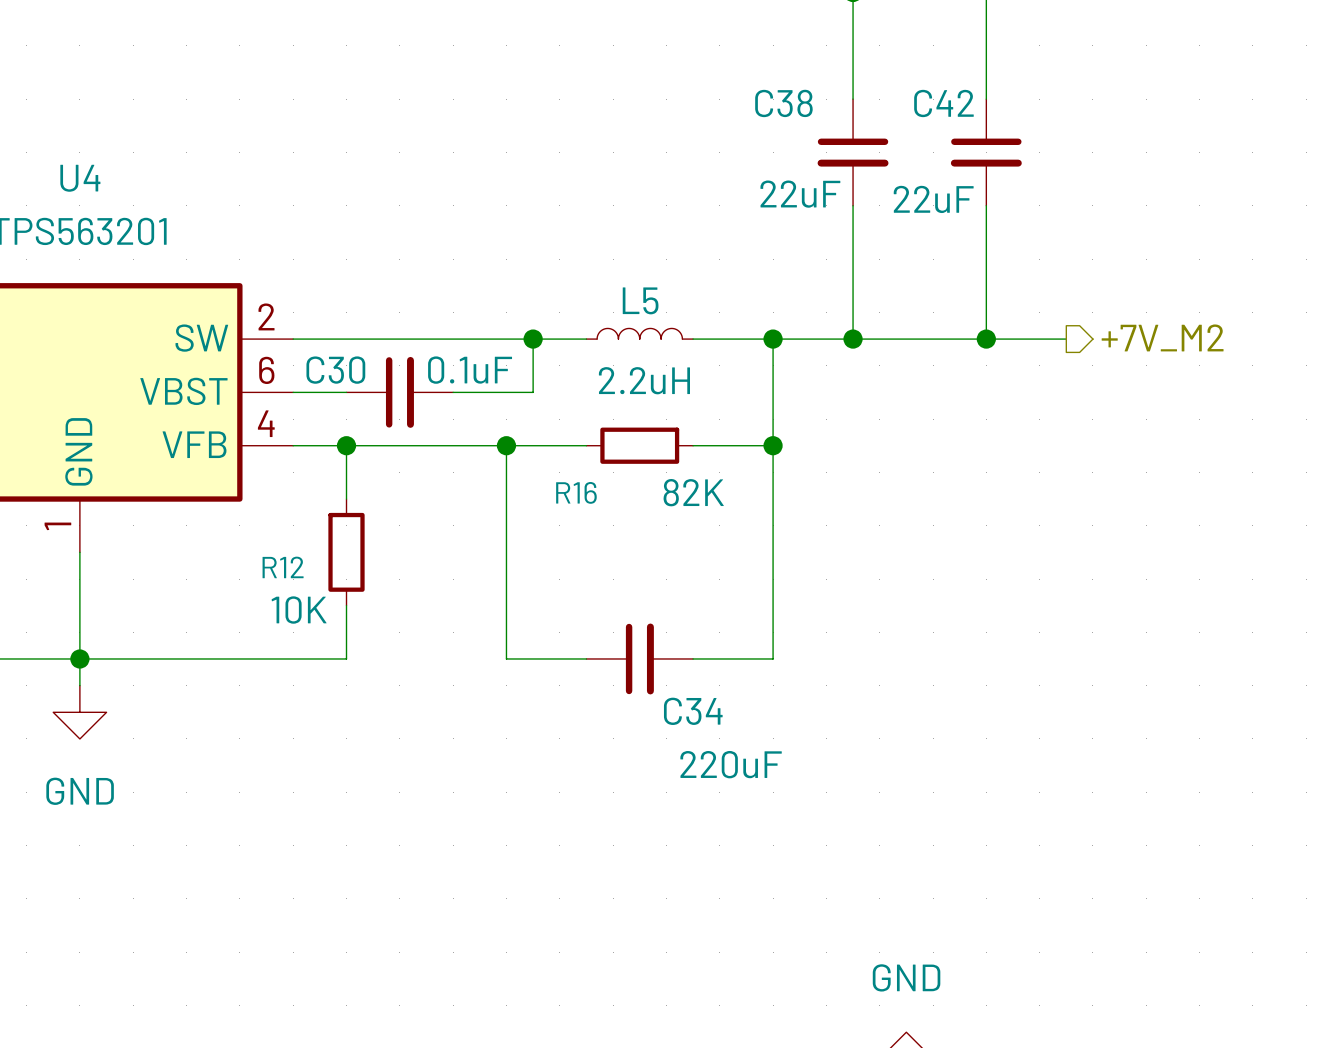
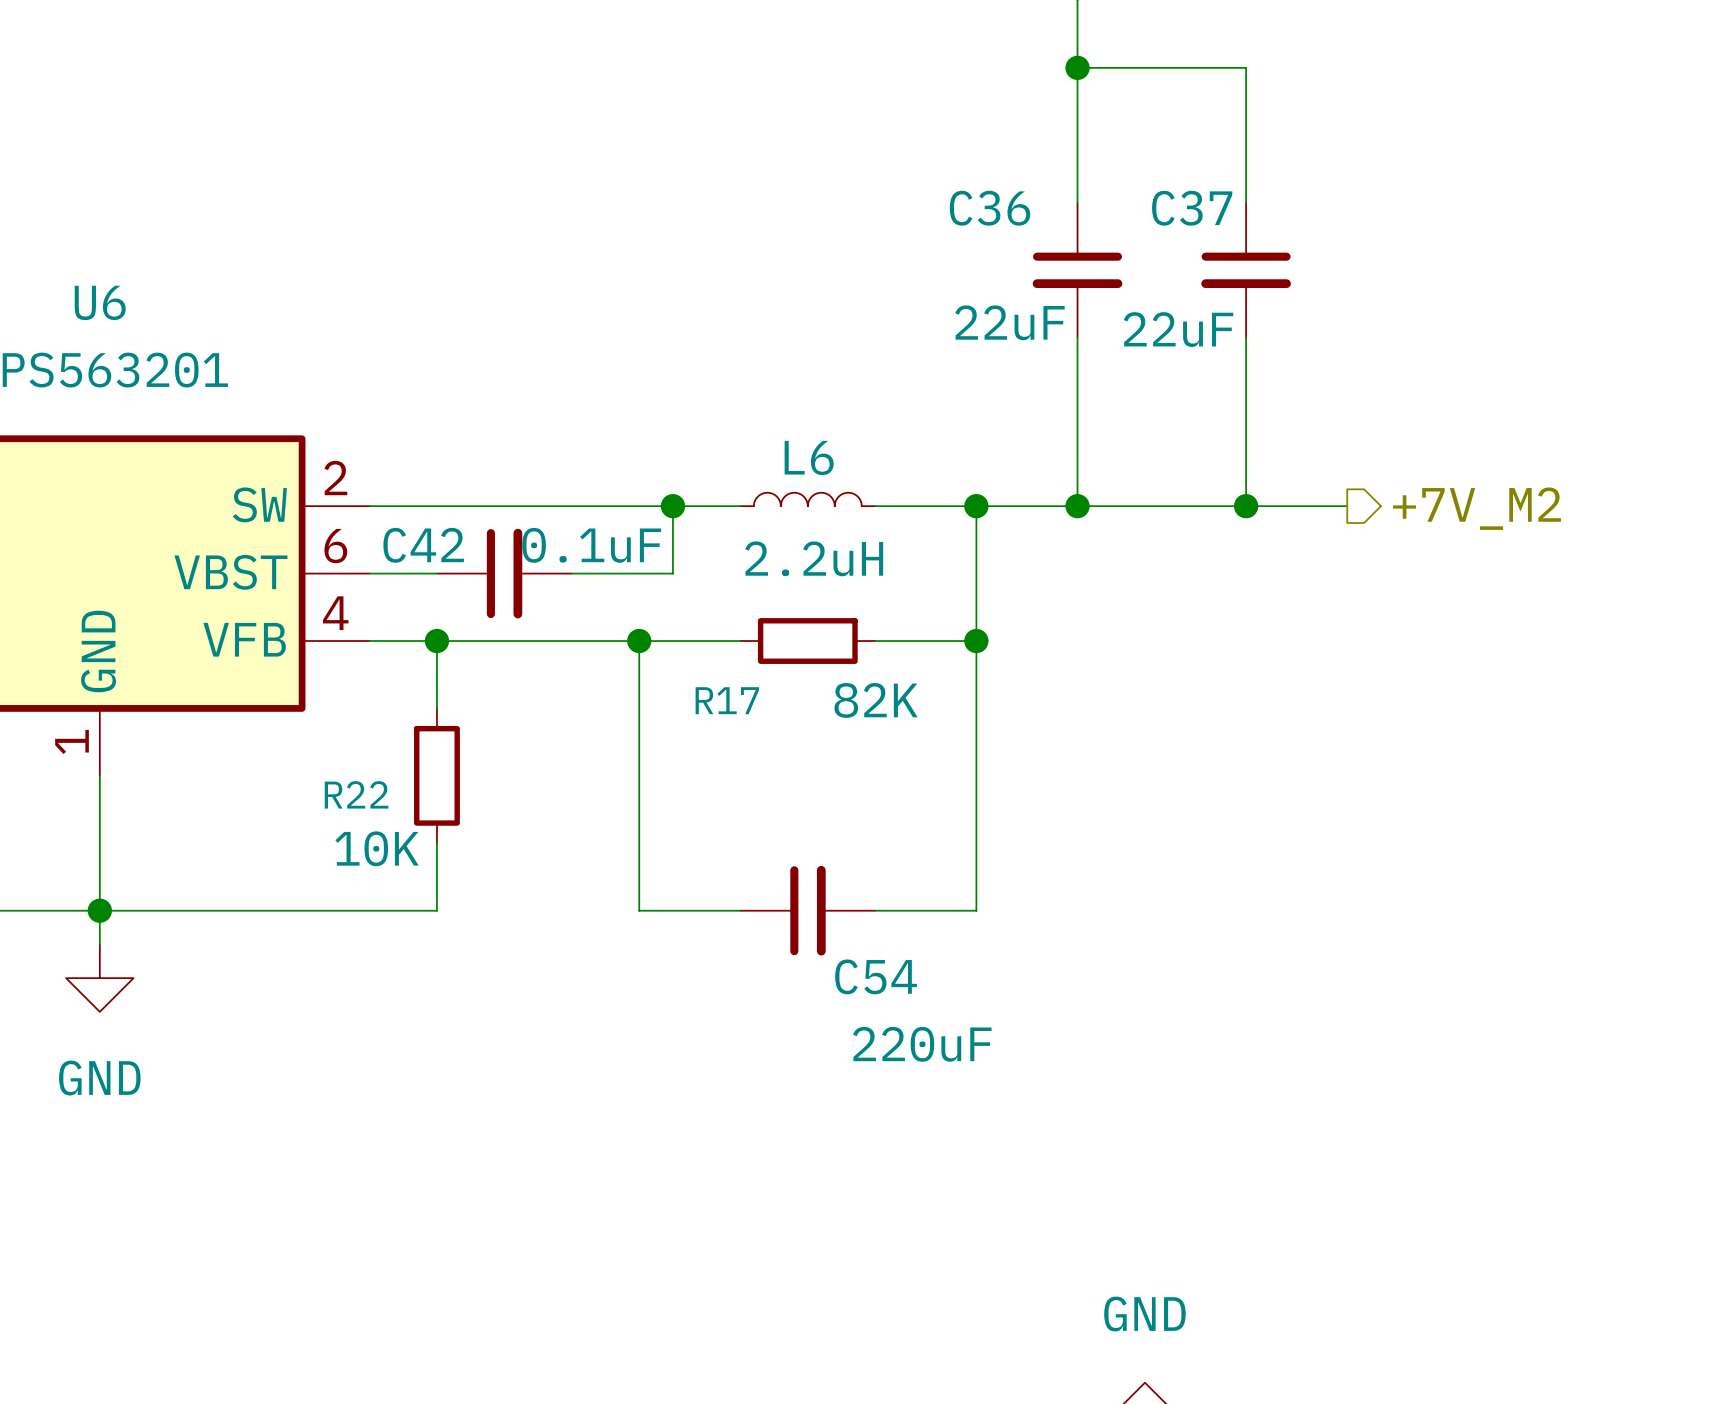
C38 name: C38 (783, 103) -> C36 (990, 208)
C42 name: C42 (943, 103) -> C37 (1192, 208)
U4 name: U4 (80, 178) -> U6 (100, 302)
L5 name: L5 (640, 300) -> L6 (809, 457)
C30 name: C30 (335, 370) -> C42 (423, 545)
R16 name: R16 (576, 492) -> R17 (727, 700)
R12 name: R12 (283, 567) -> R22 (356, 794)
C34 name: C34 (693, 711) -> C54 (876, 976)

